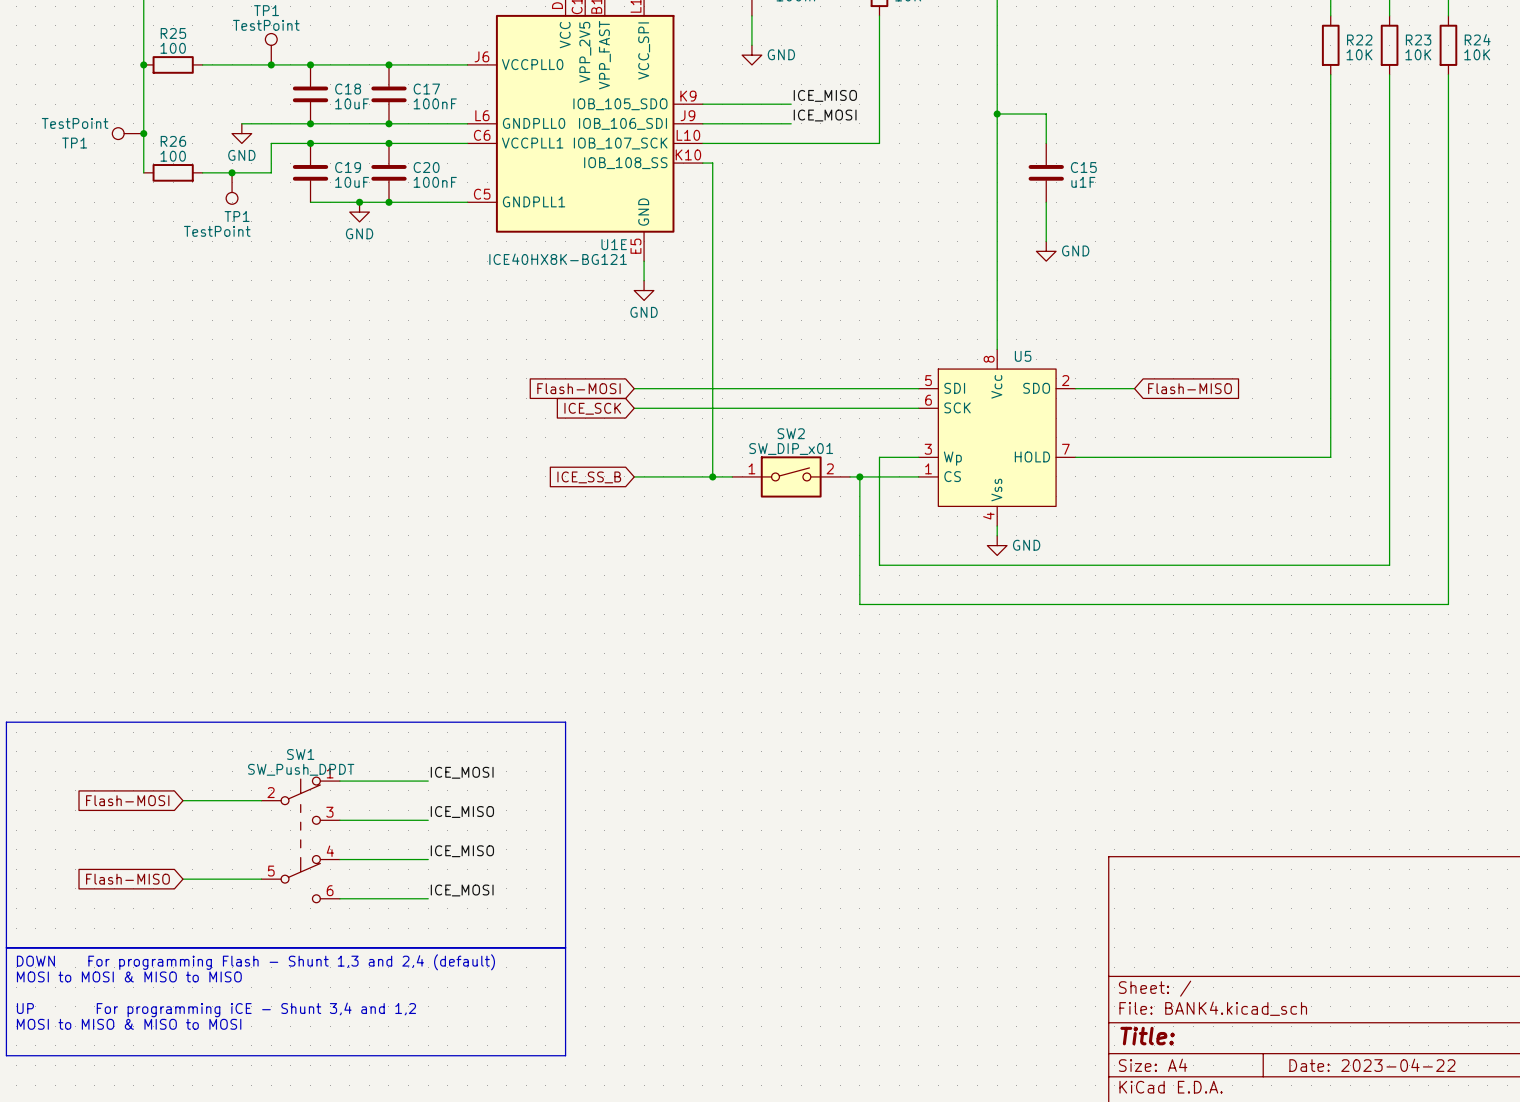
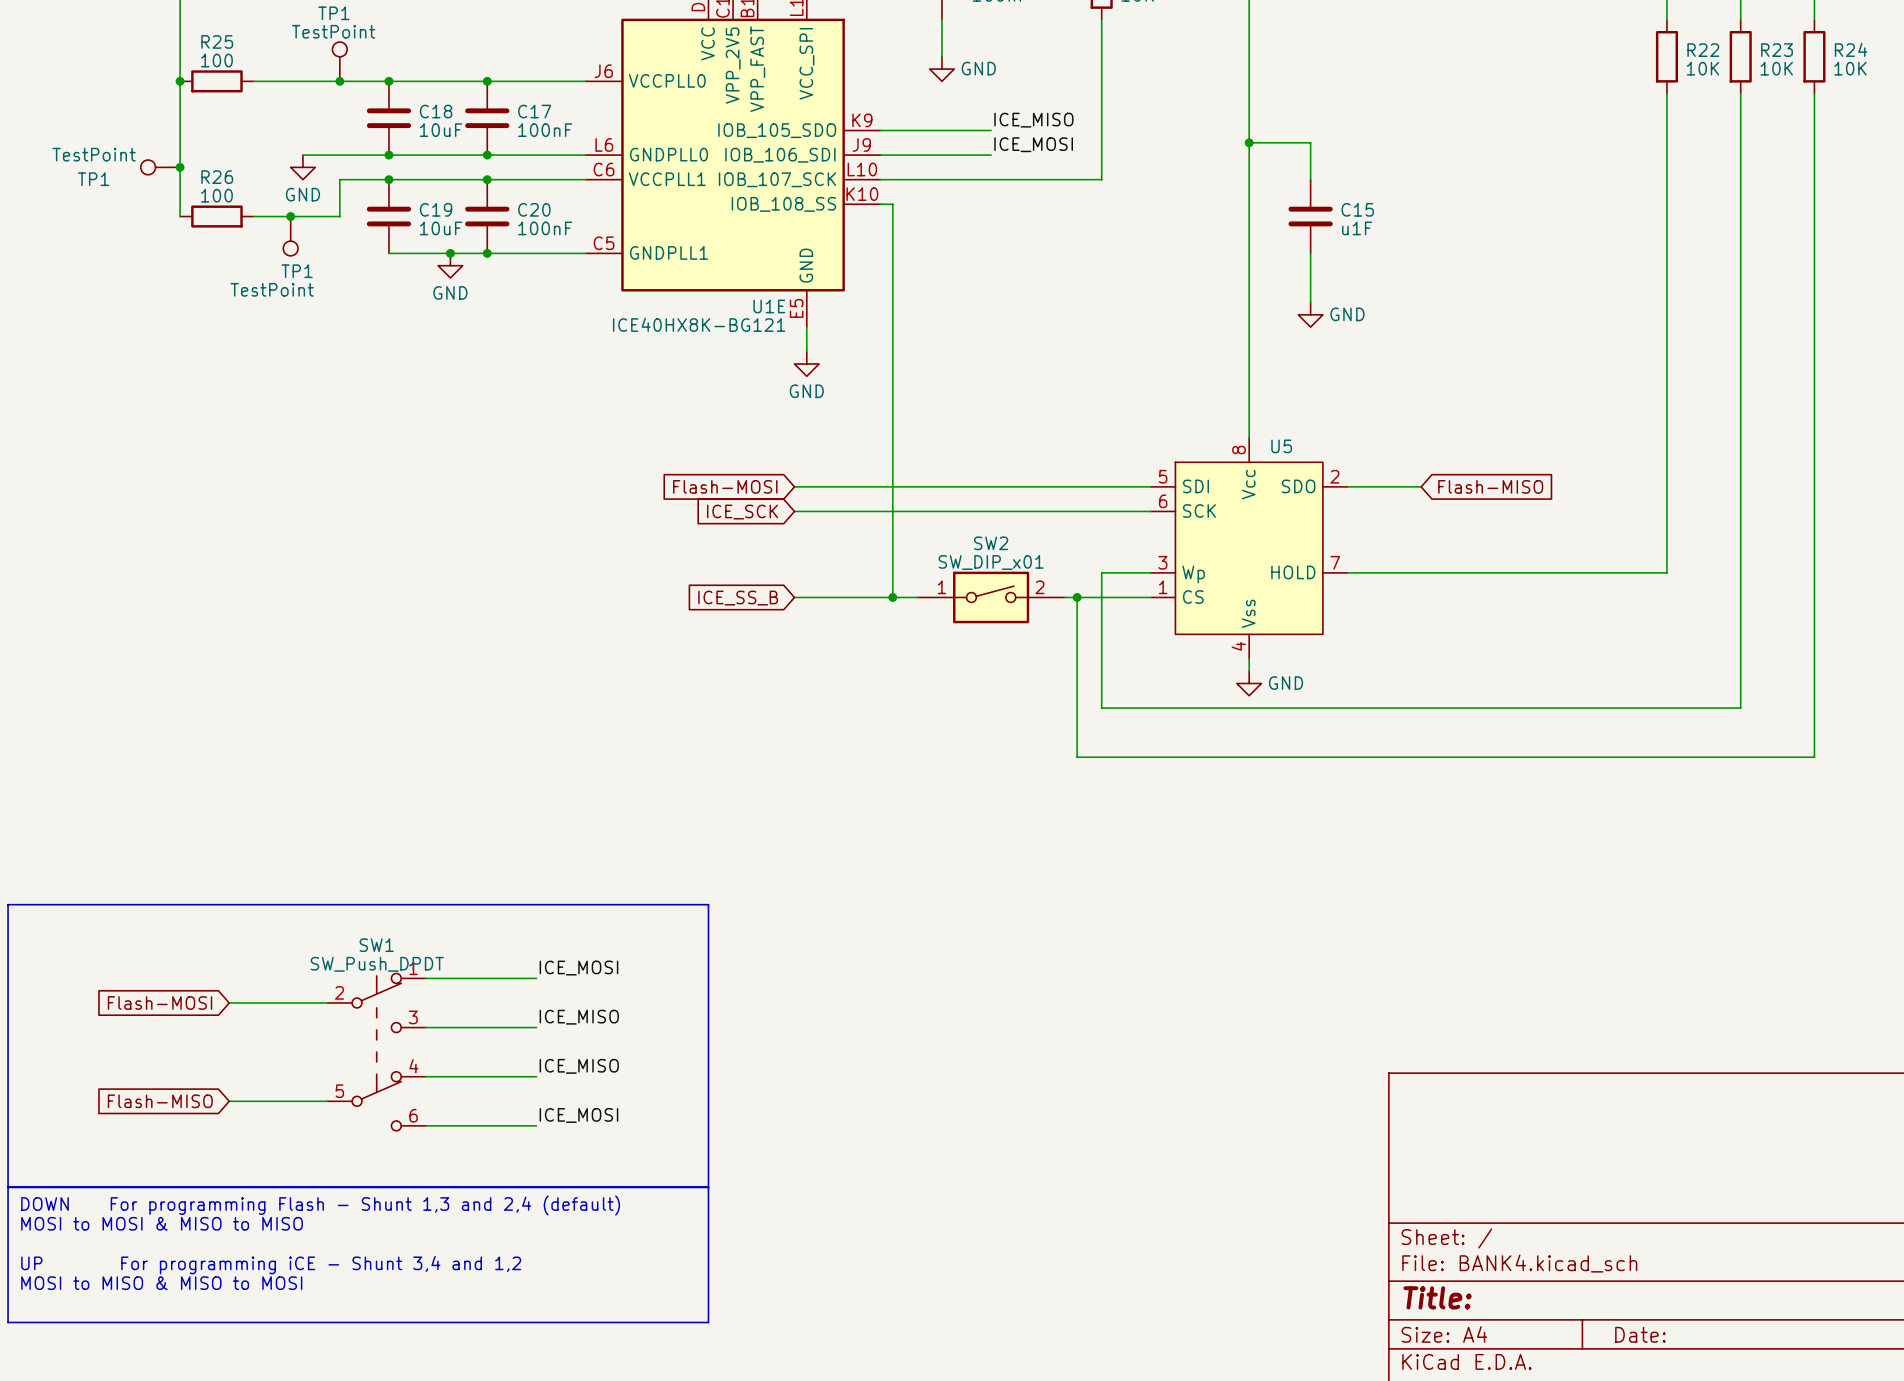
title block: Date: 2023-04-22 (1372, 1065) -> Date: (1640, 1334)

